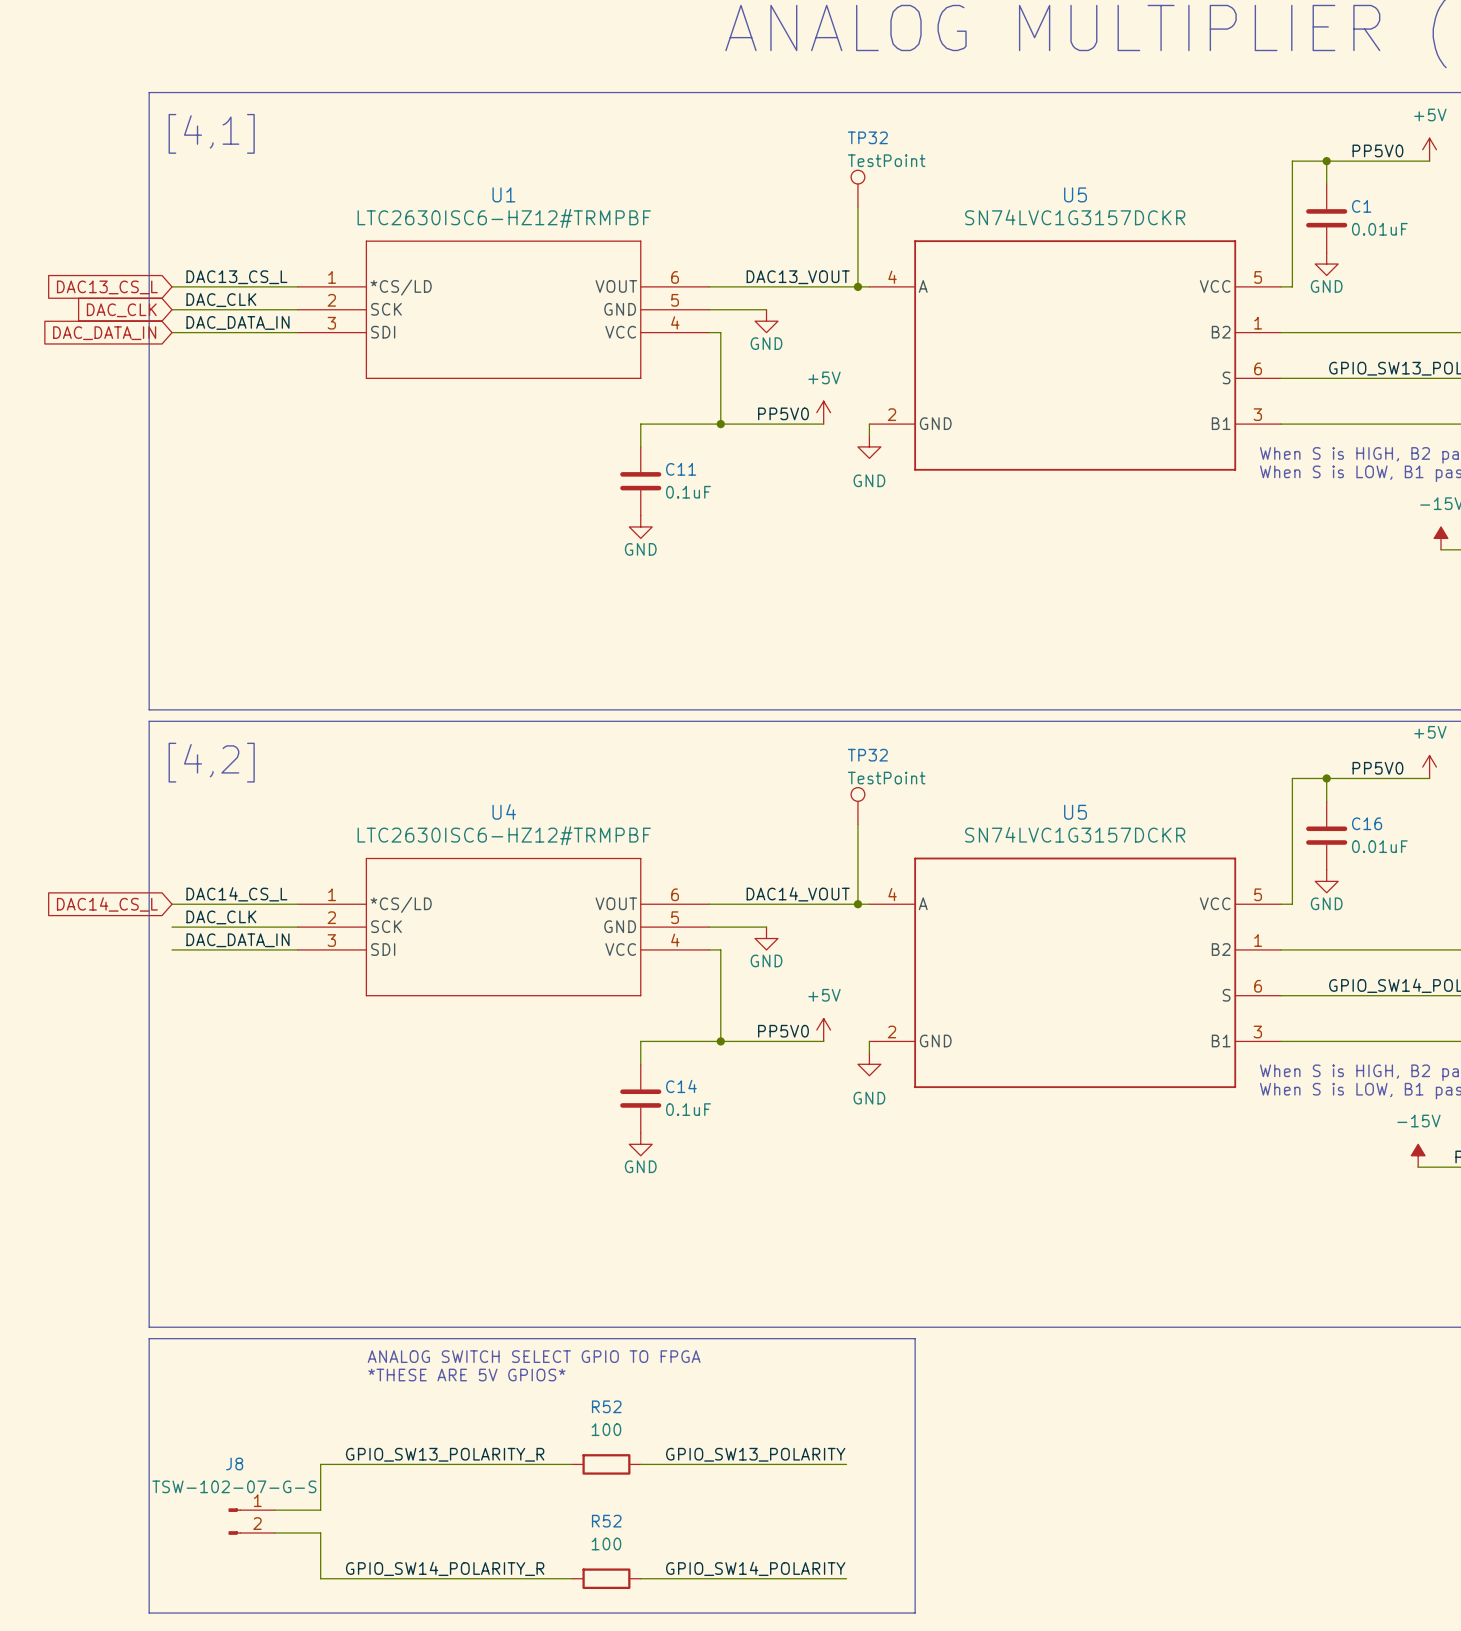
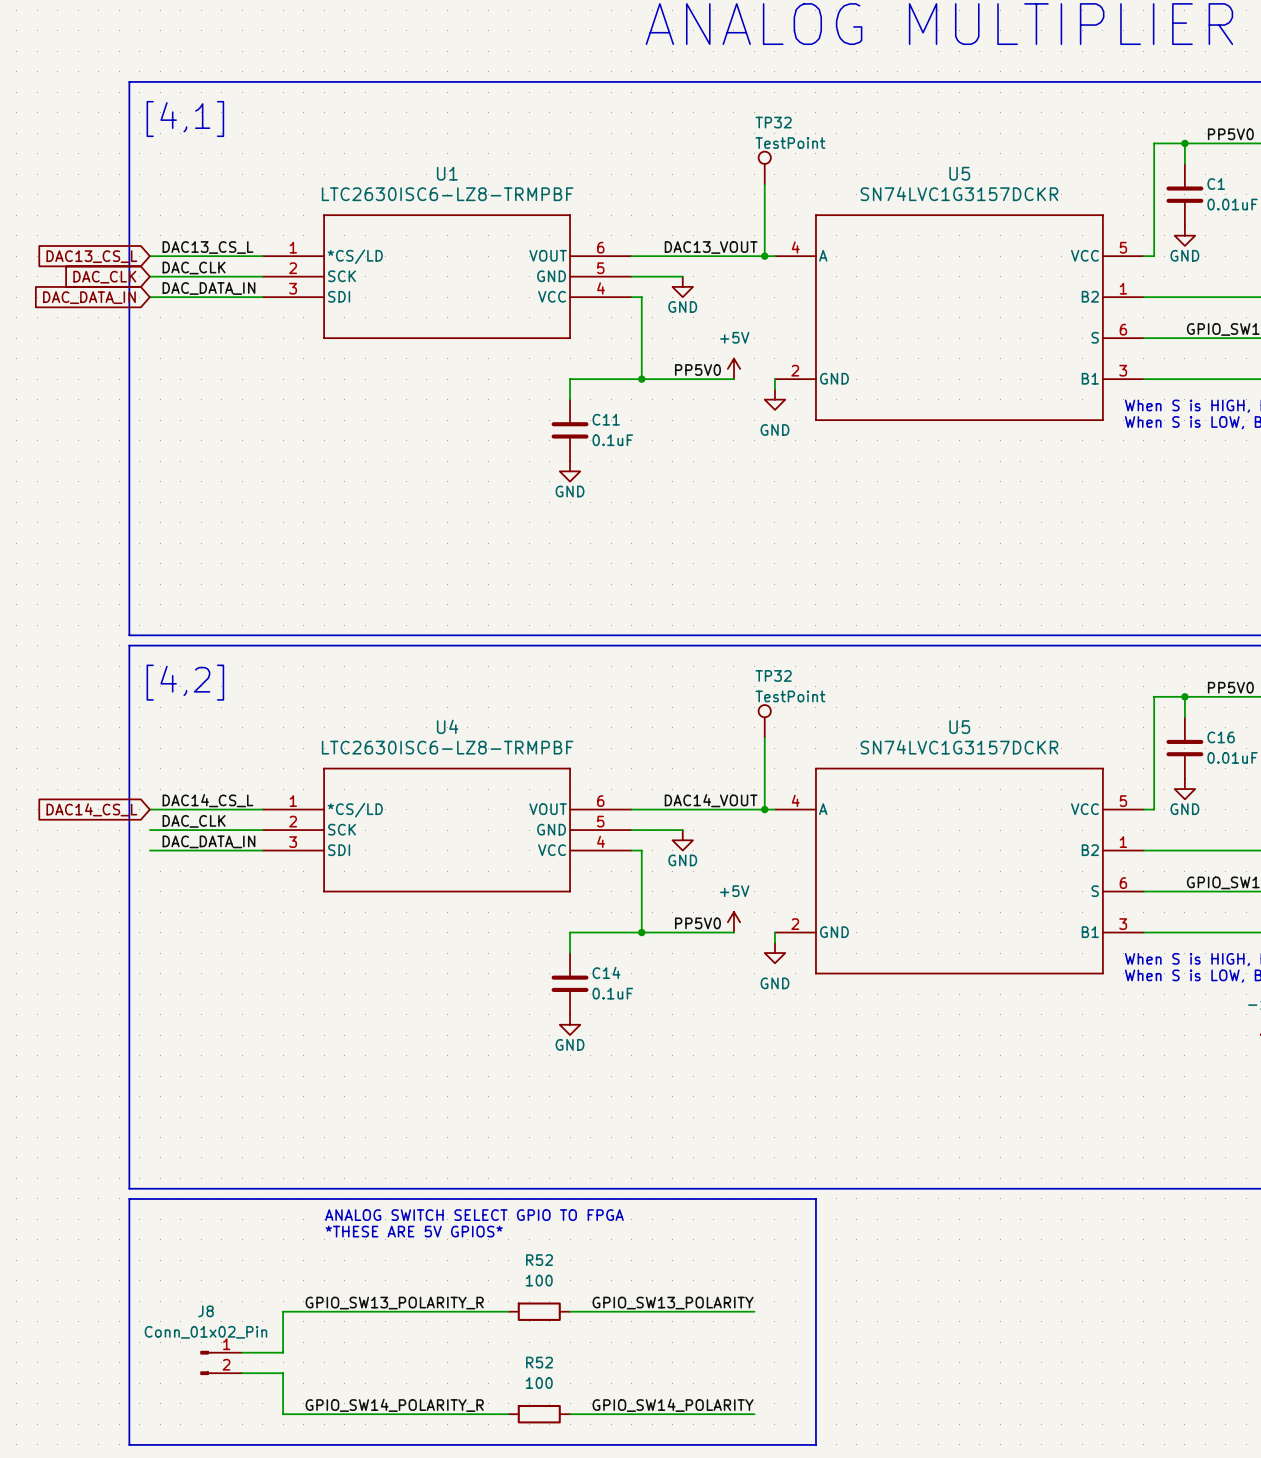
U1 value: LTC2630ISC6-HZ12#TRMPBF (504, 218) -> LTC2630ISC6-LZ8-TRMPBF (447, 194)
U4 value: LTC2630ISC6-HZ12#TRMPBF (504, 835) -> LTC2630ISC6-LZ8-TRMPBF (447, 747)
J8 value: TSW-102-07-G-S (234, 1486) -> Conn_01x02_Pin (205, 1332)

